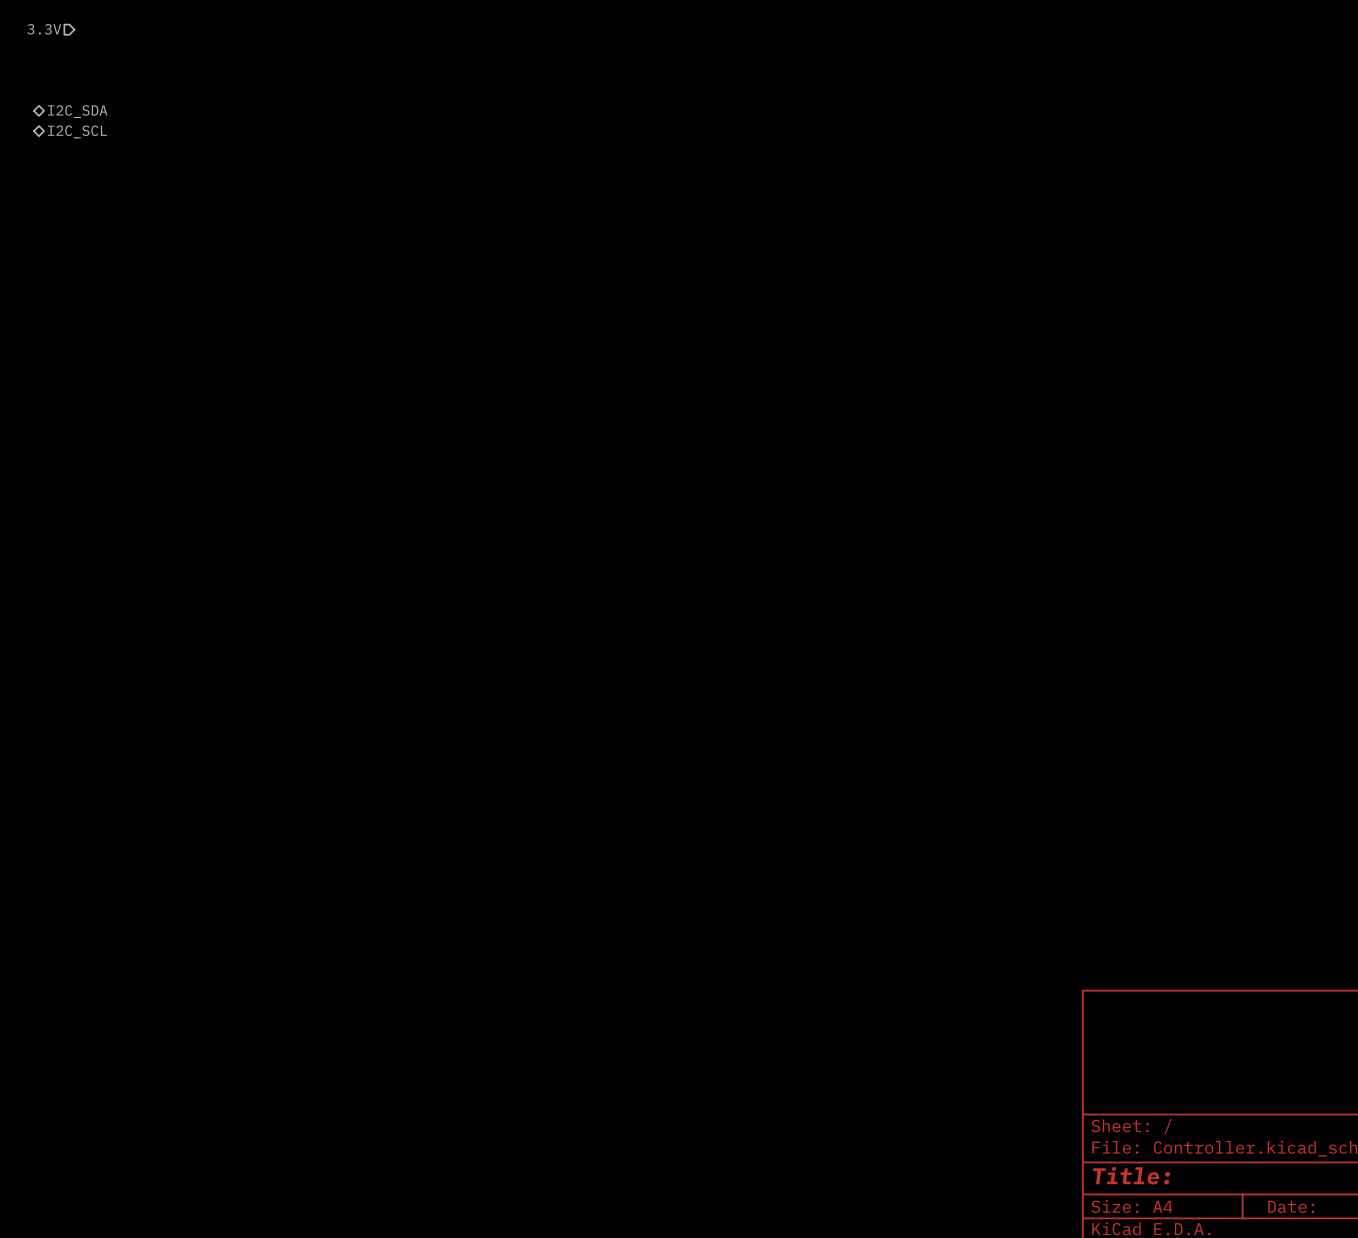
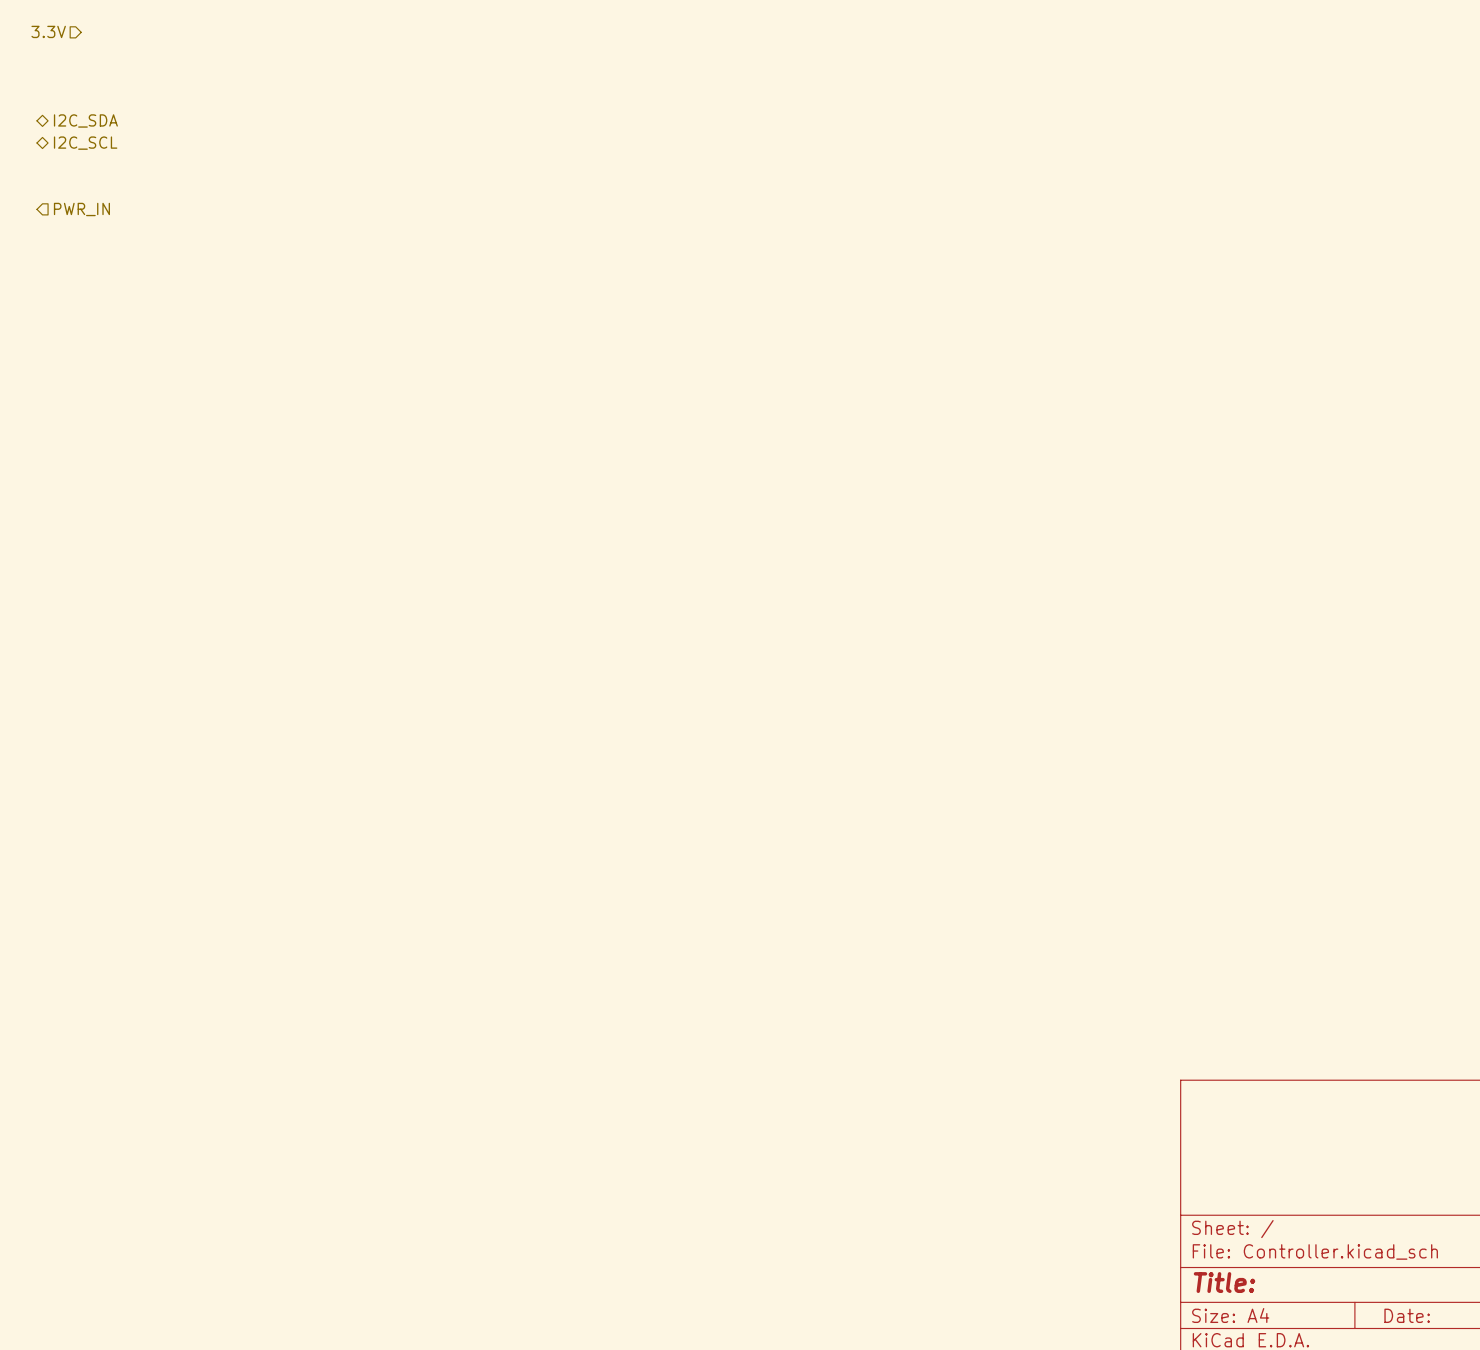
hierarchical label: none -> PWR_IN (81, 209)

